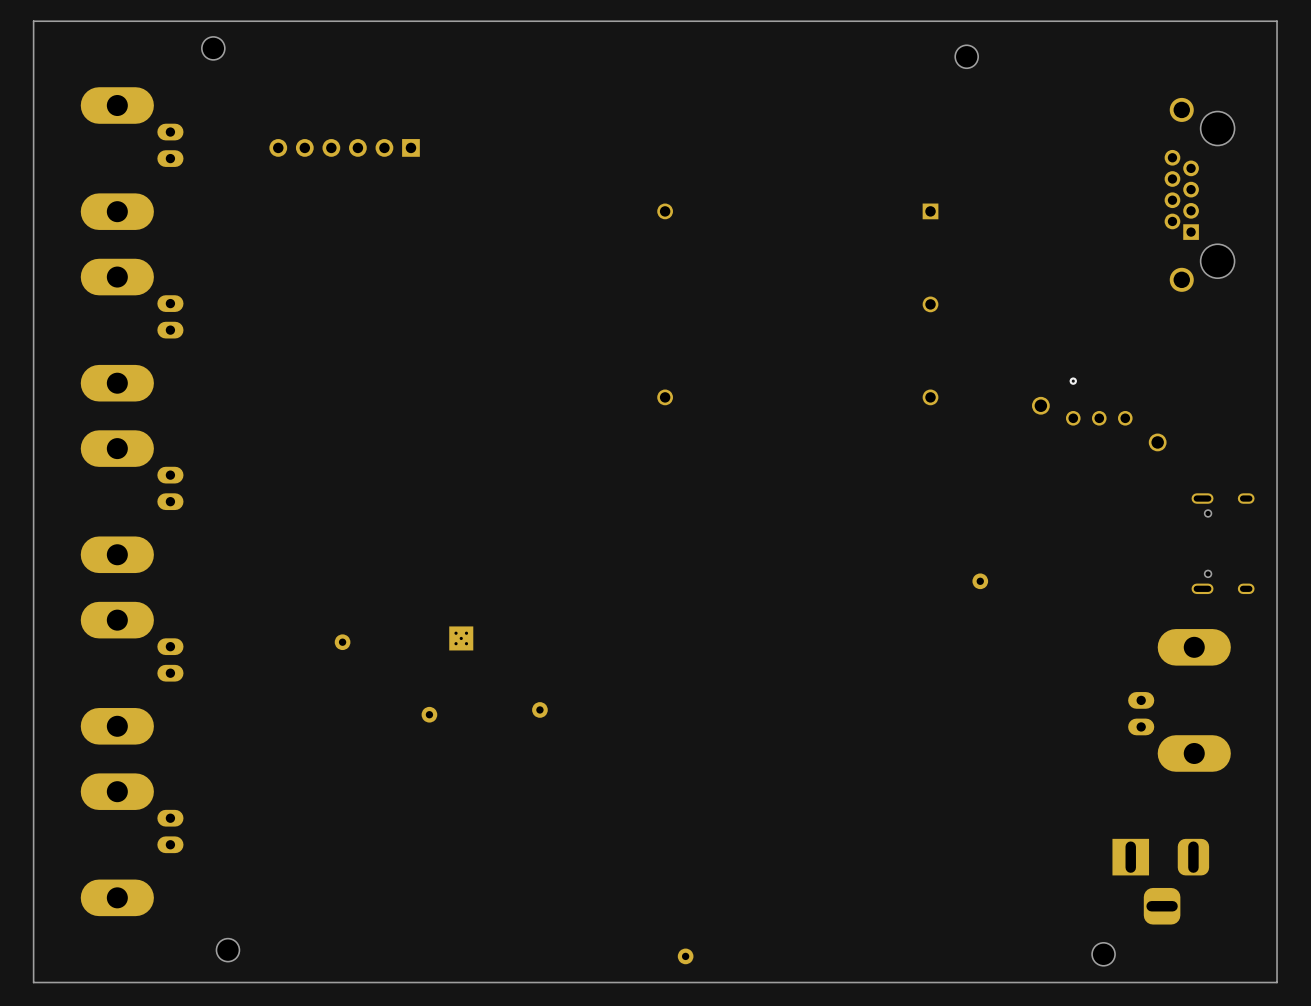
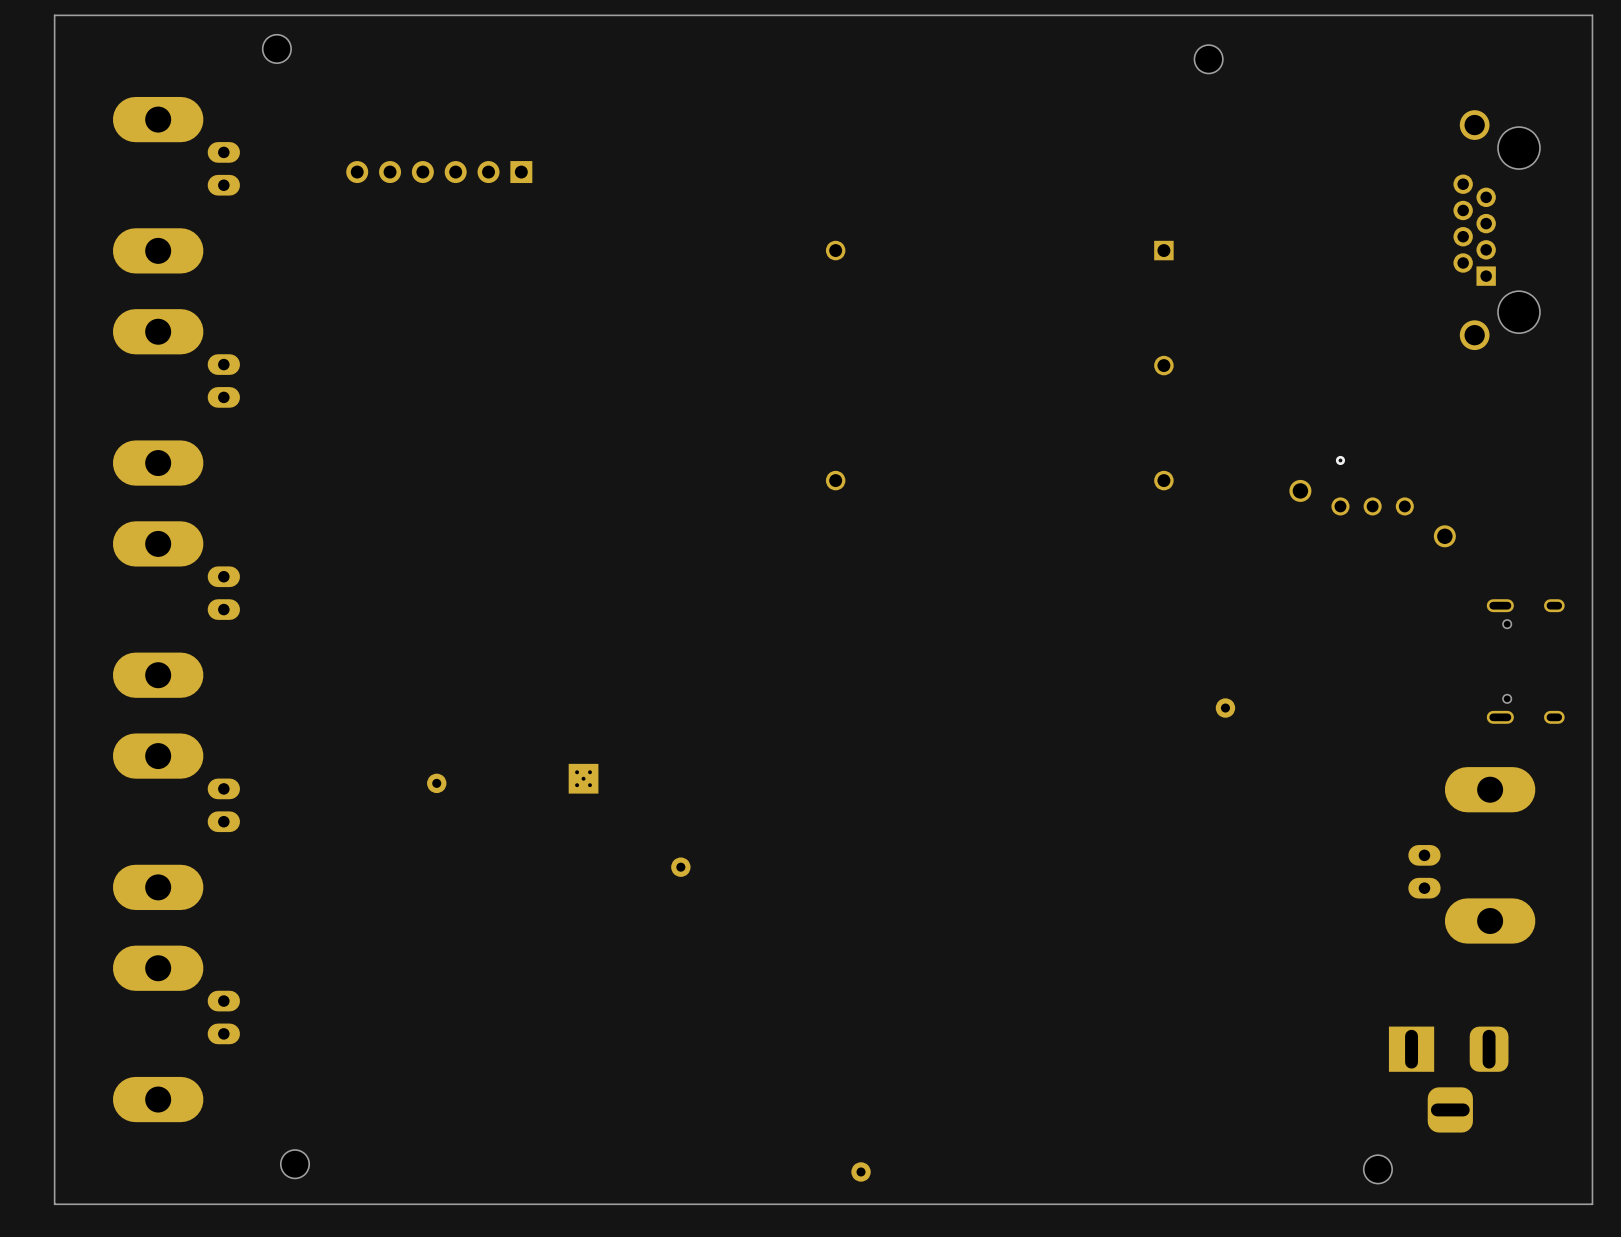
part: (429, 714) -> none

